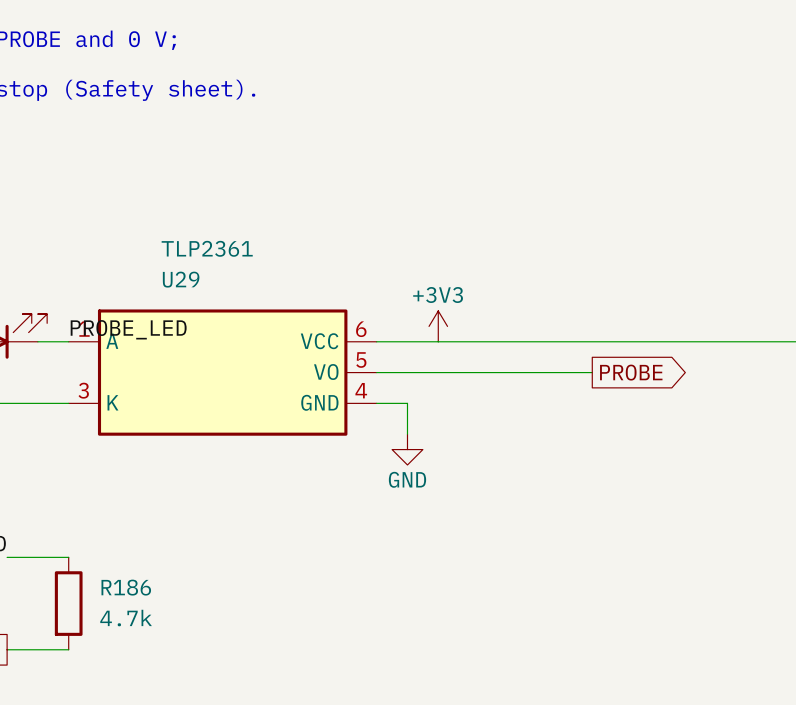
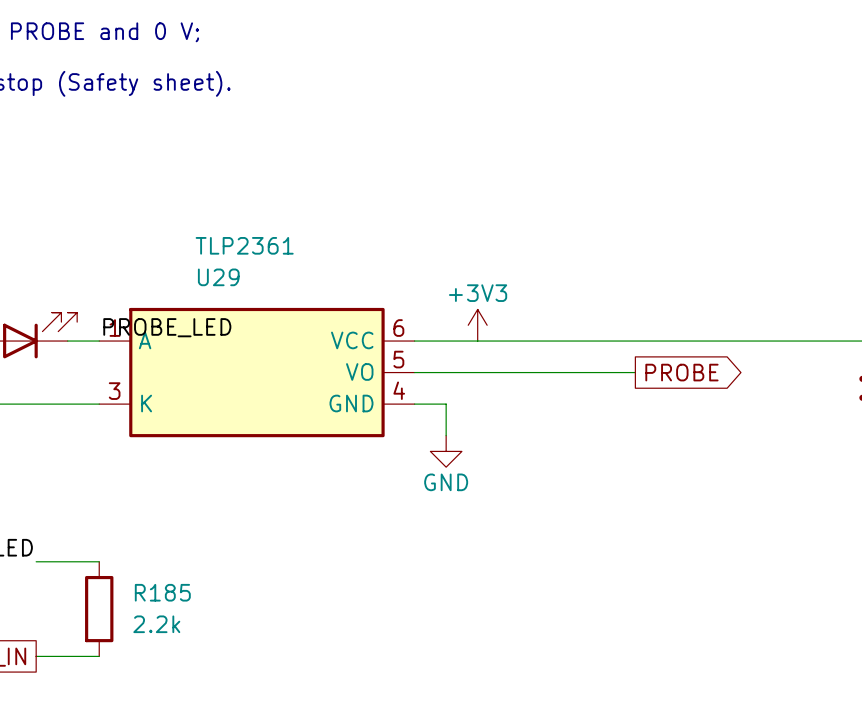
R186 name: R186 (126, 587) -> R185 (162, 592)
R186 value: 4.7k (126, 618) -> 2.2k (156, 624)

